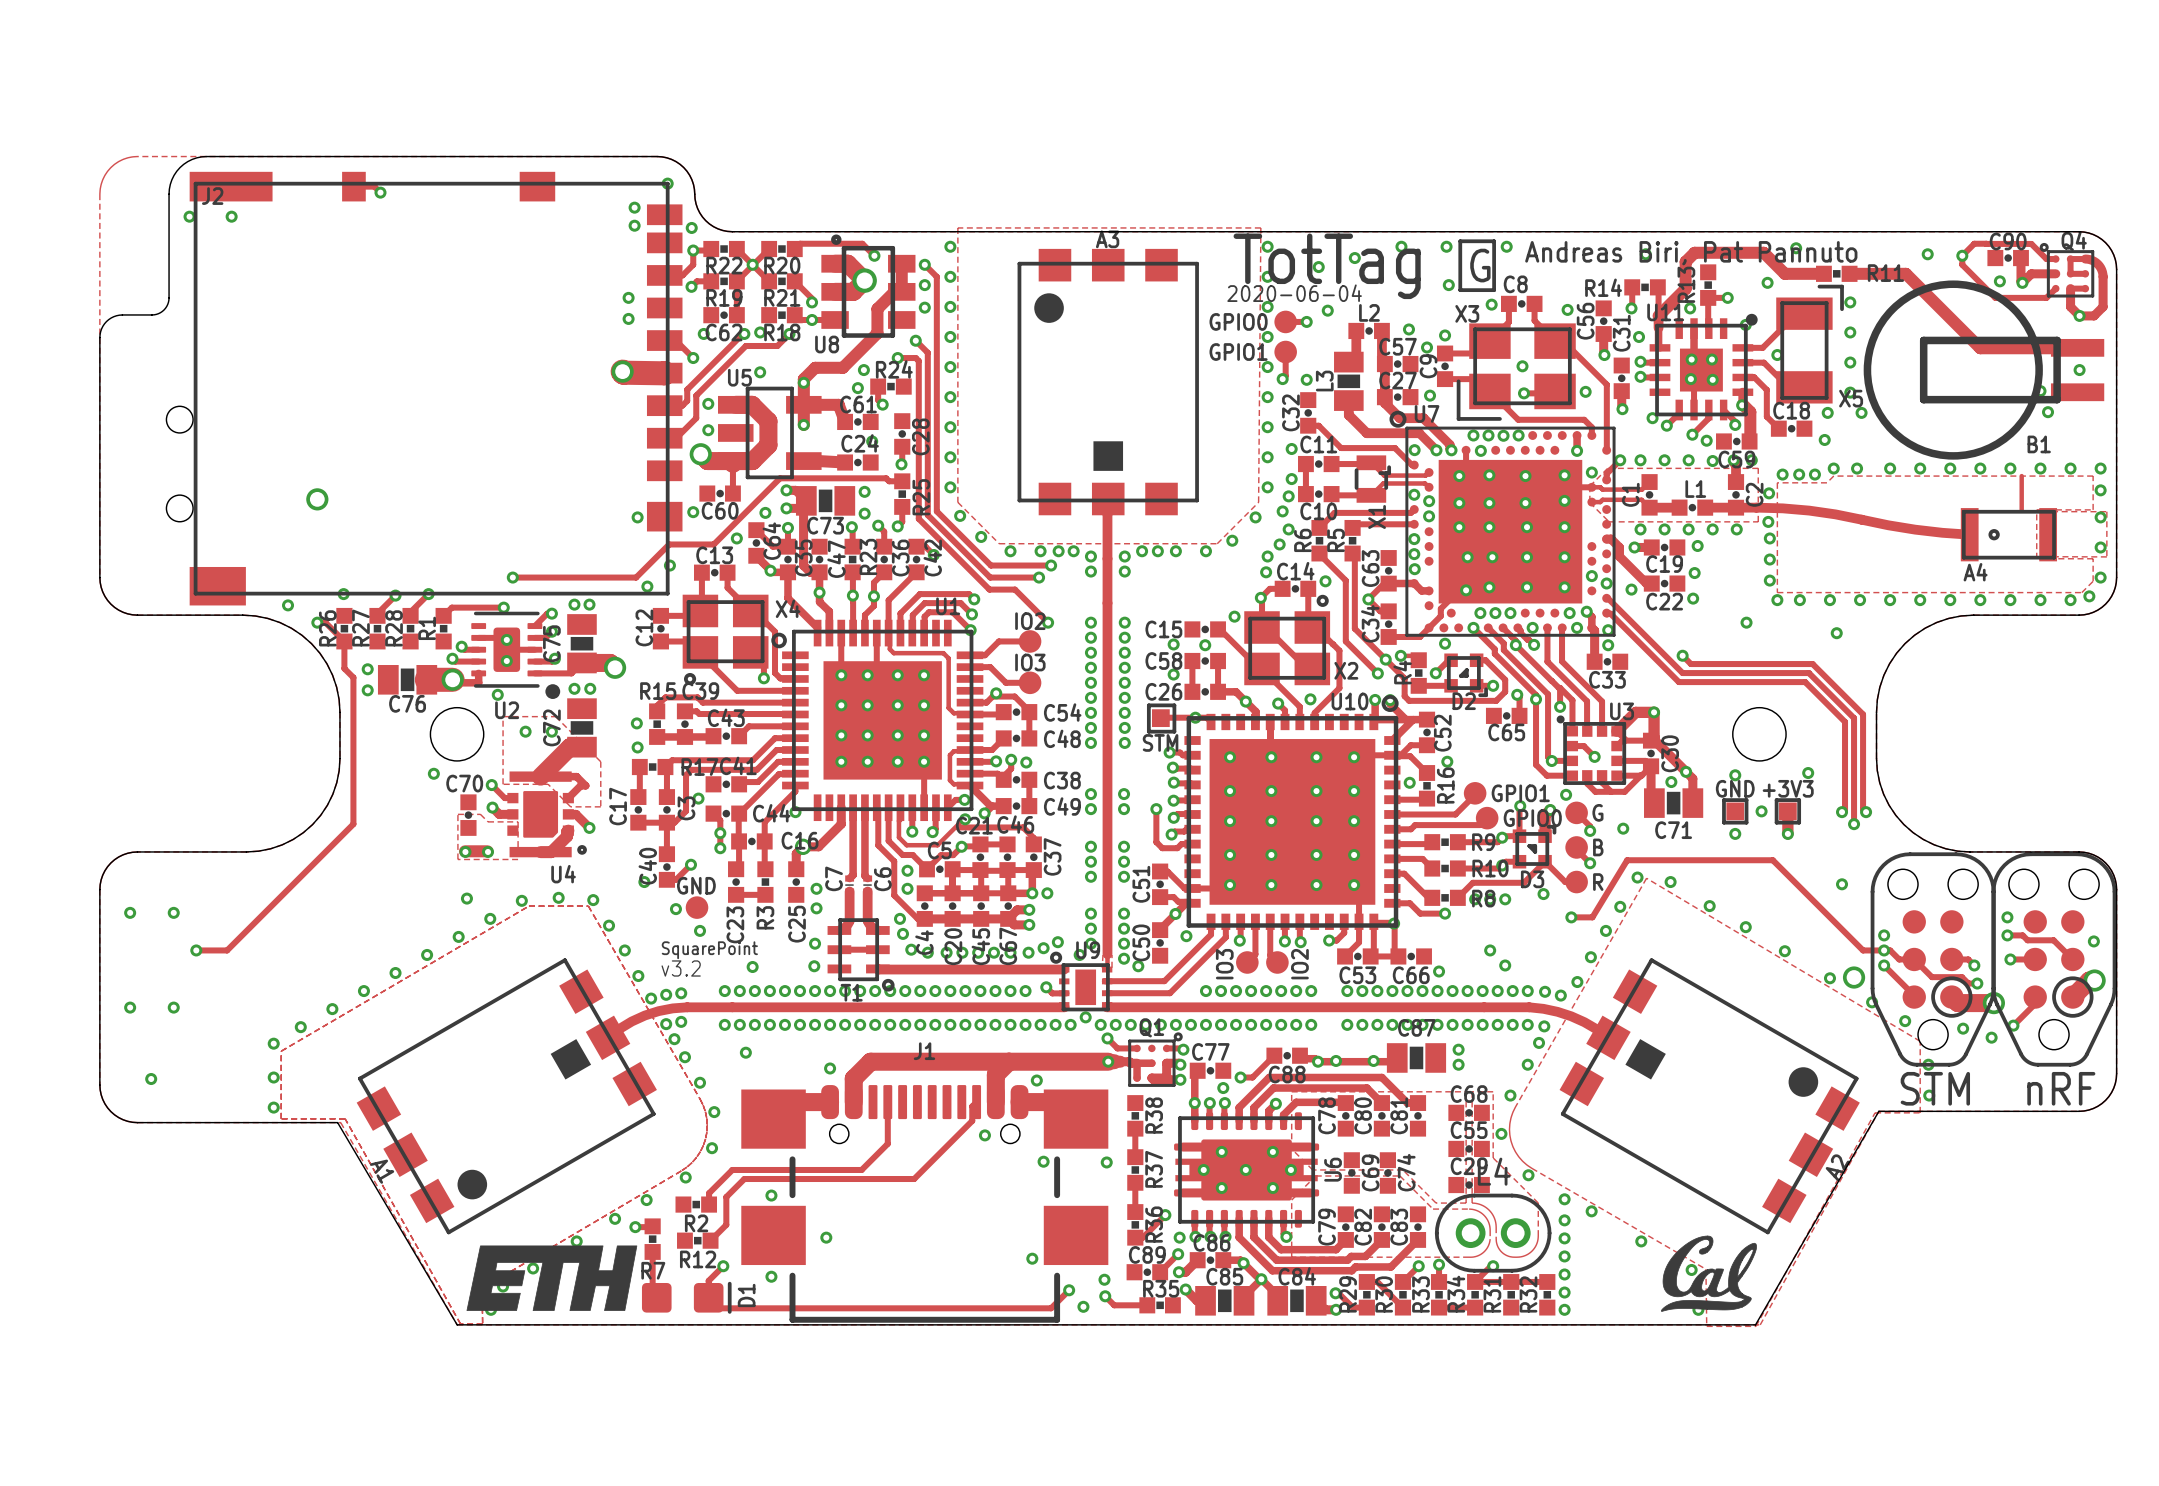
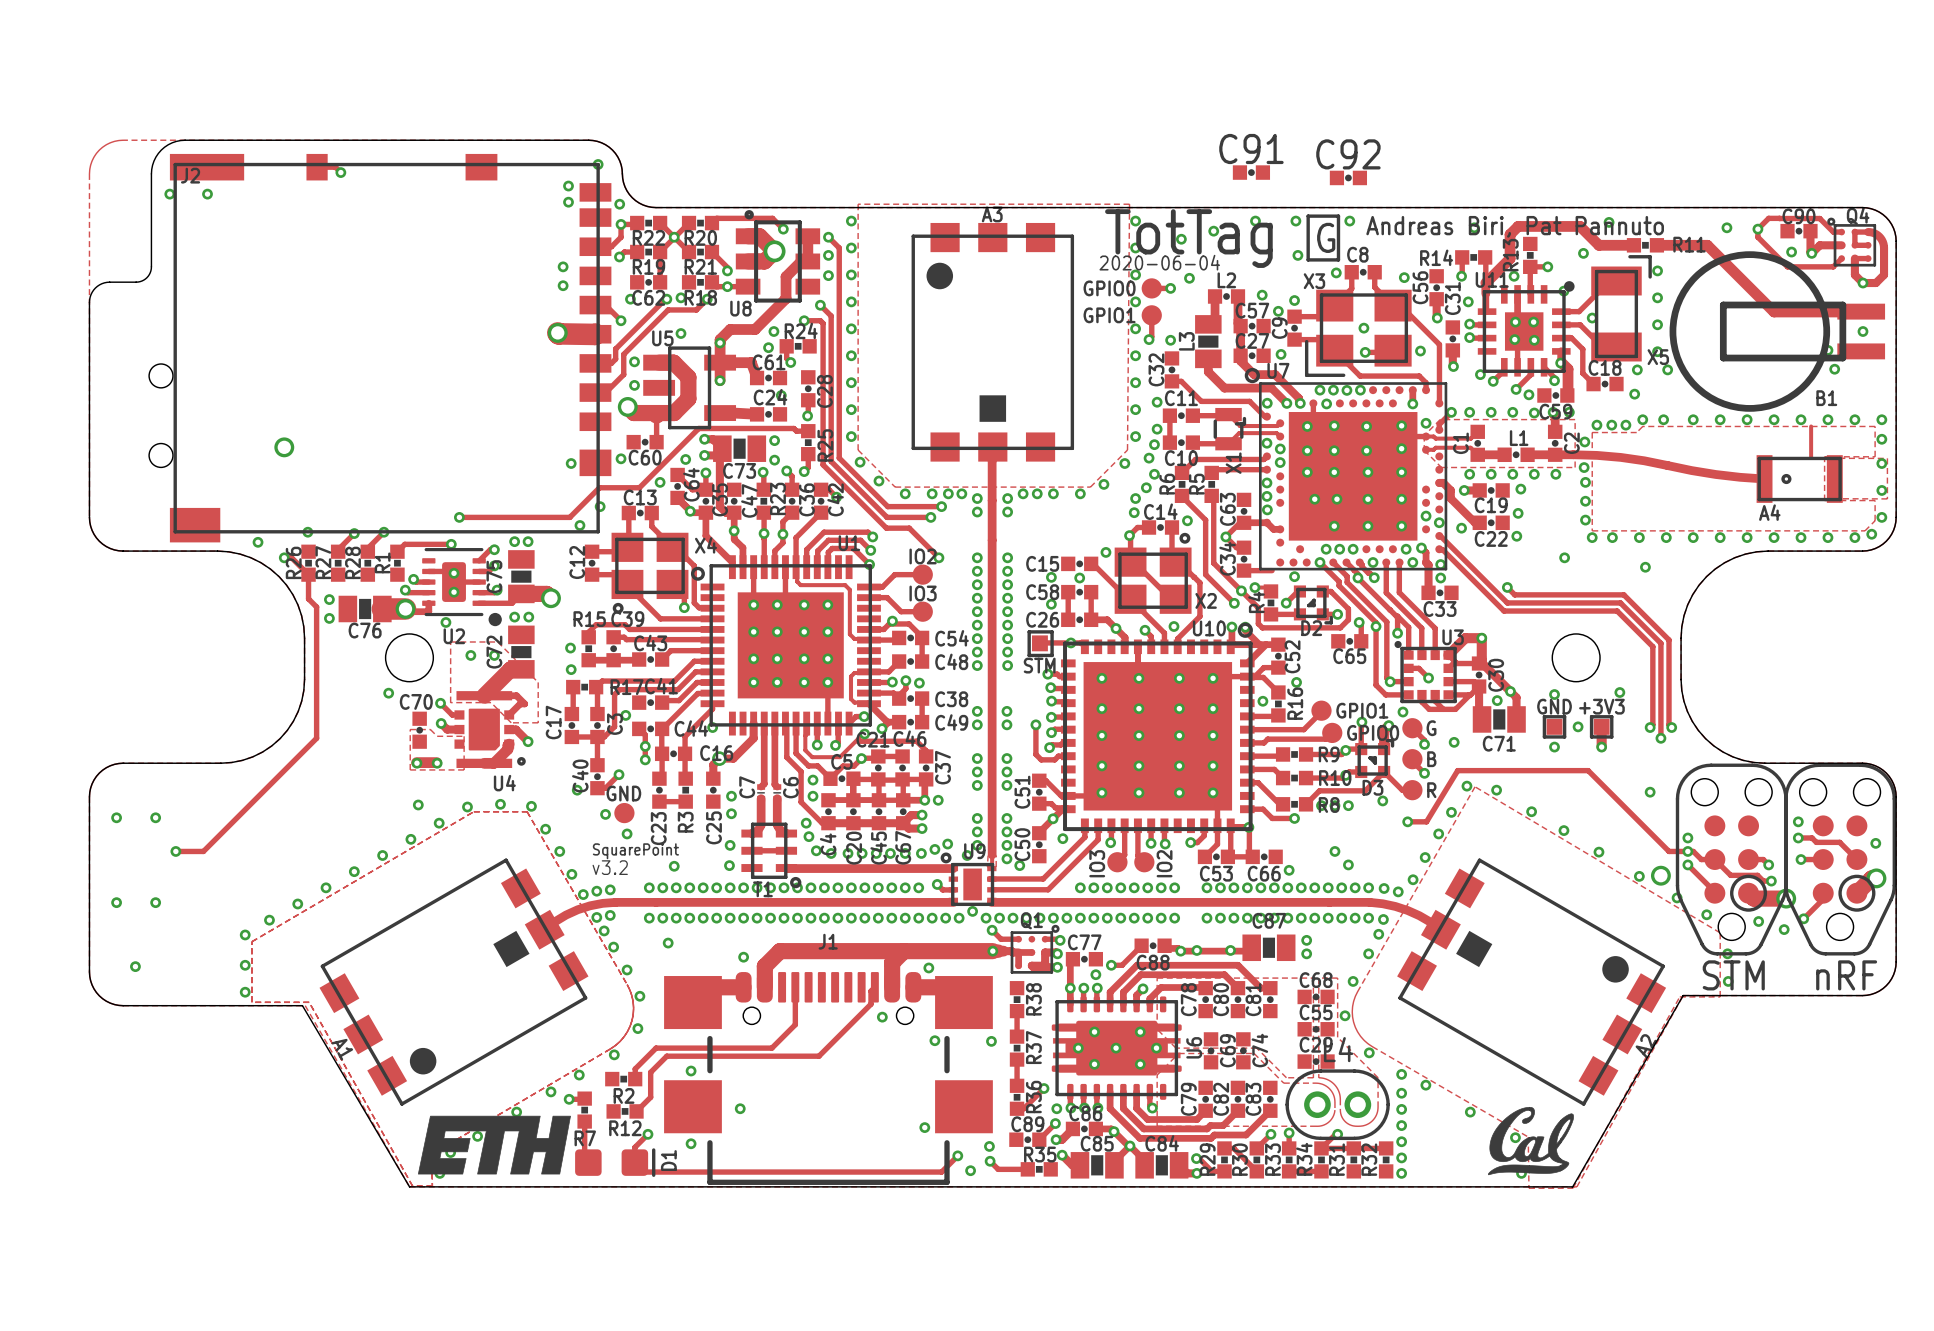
C91: none -> (1251, 172)
C92: none -> (1348, 177)
track: (1466, 590) (1459, 590) (1440, 608) (1440, 616) (1419, 636) -> none
via: (1466, 590) -> none

